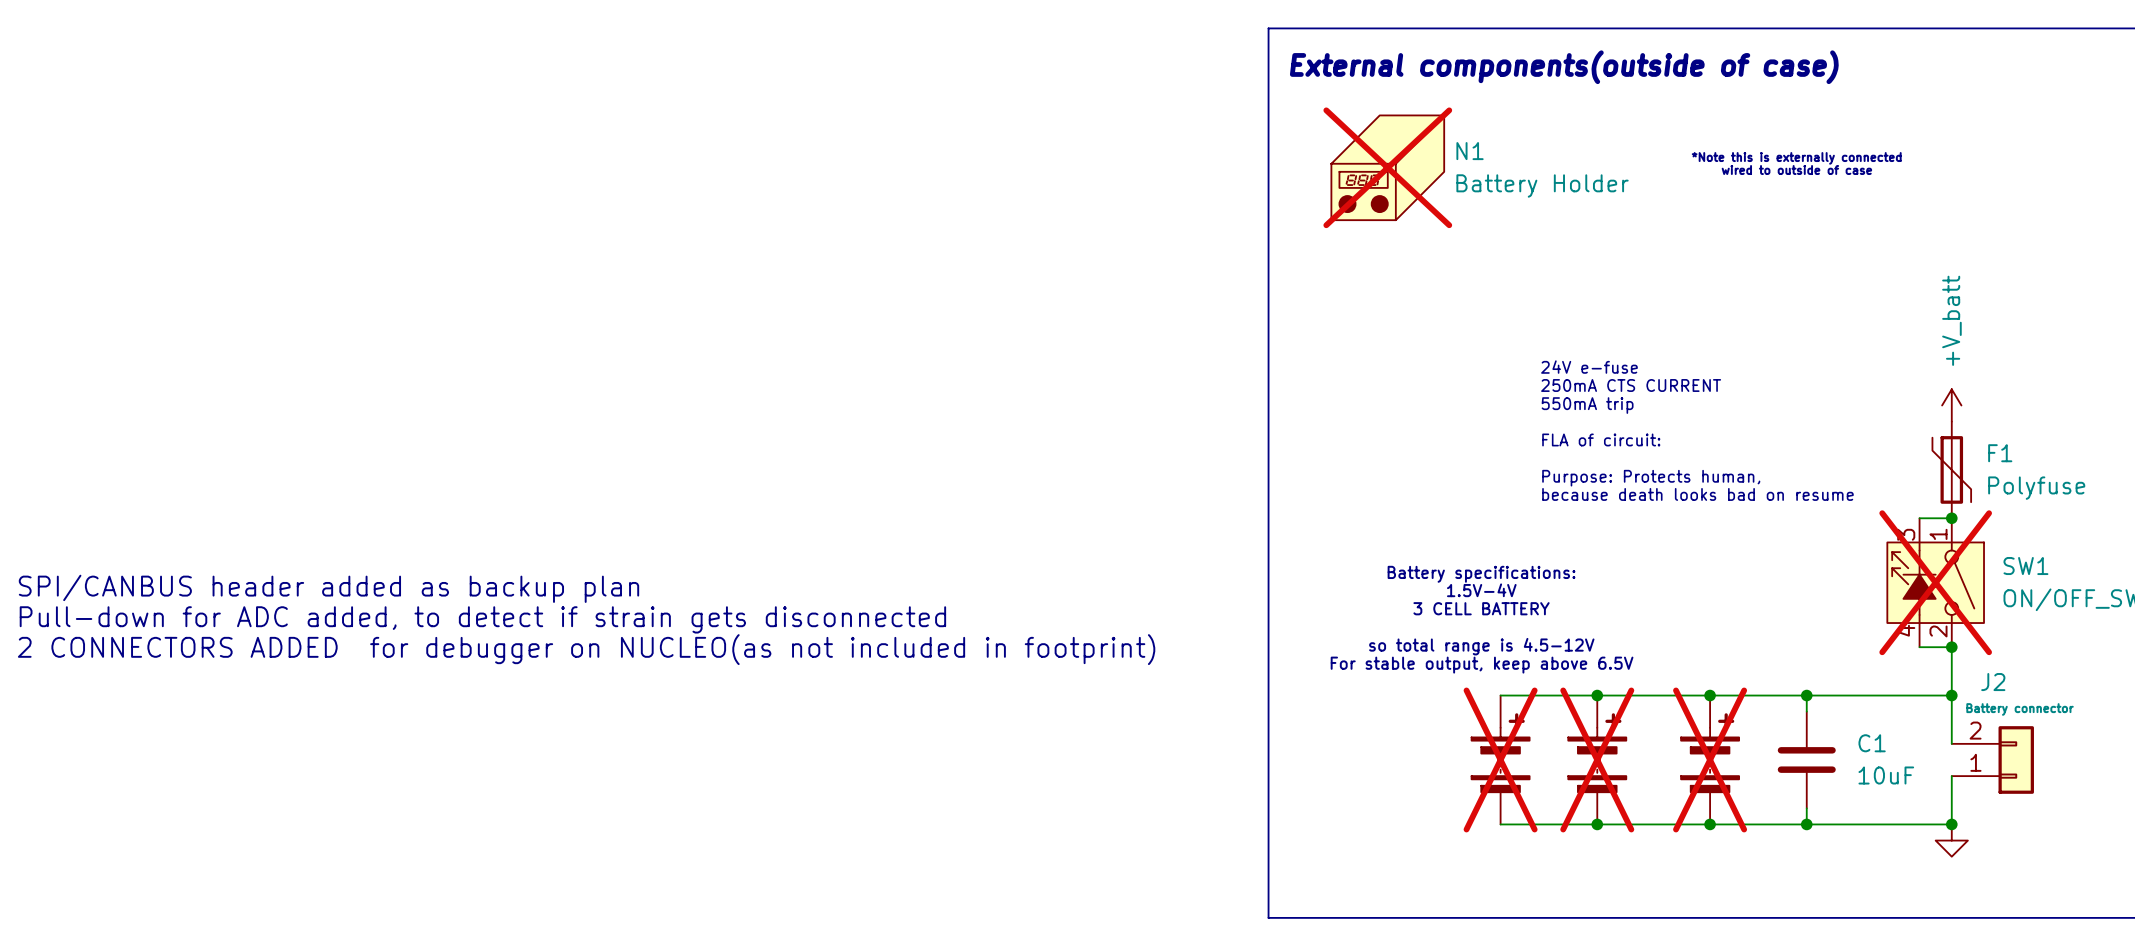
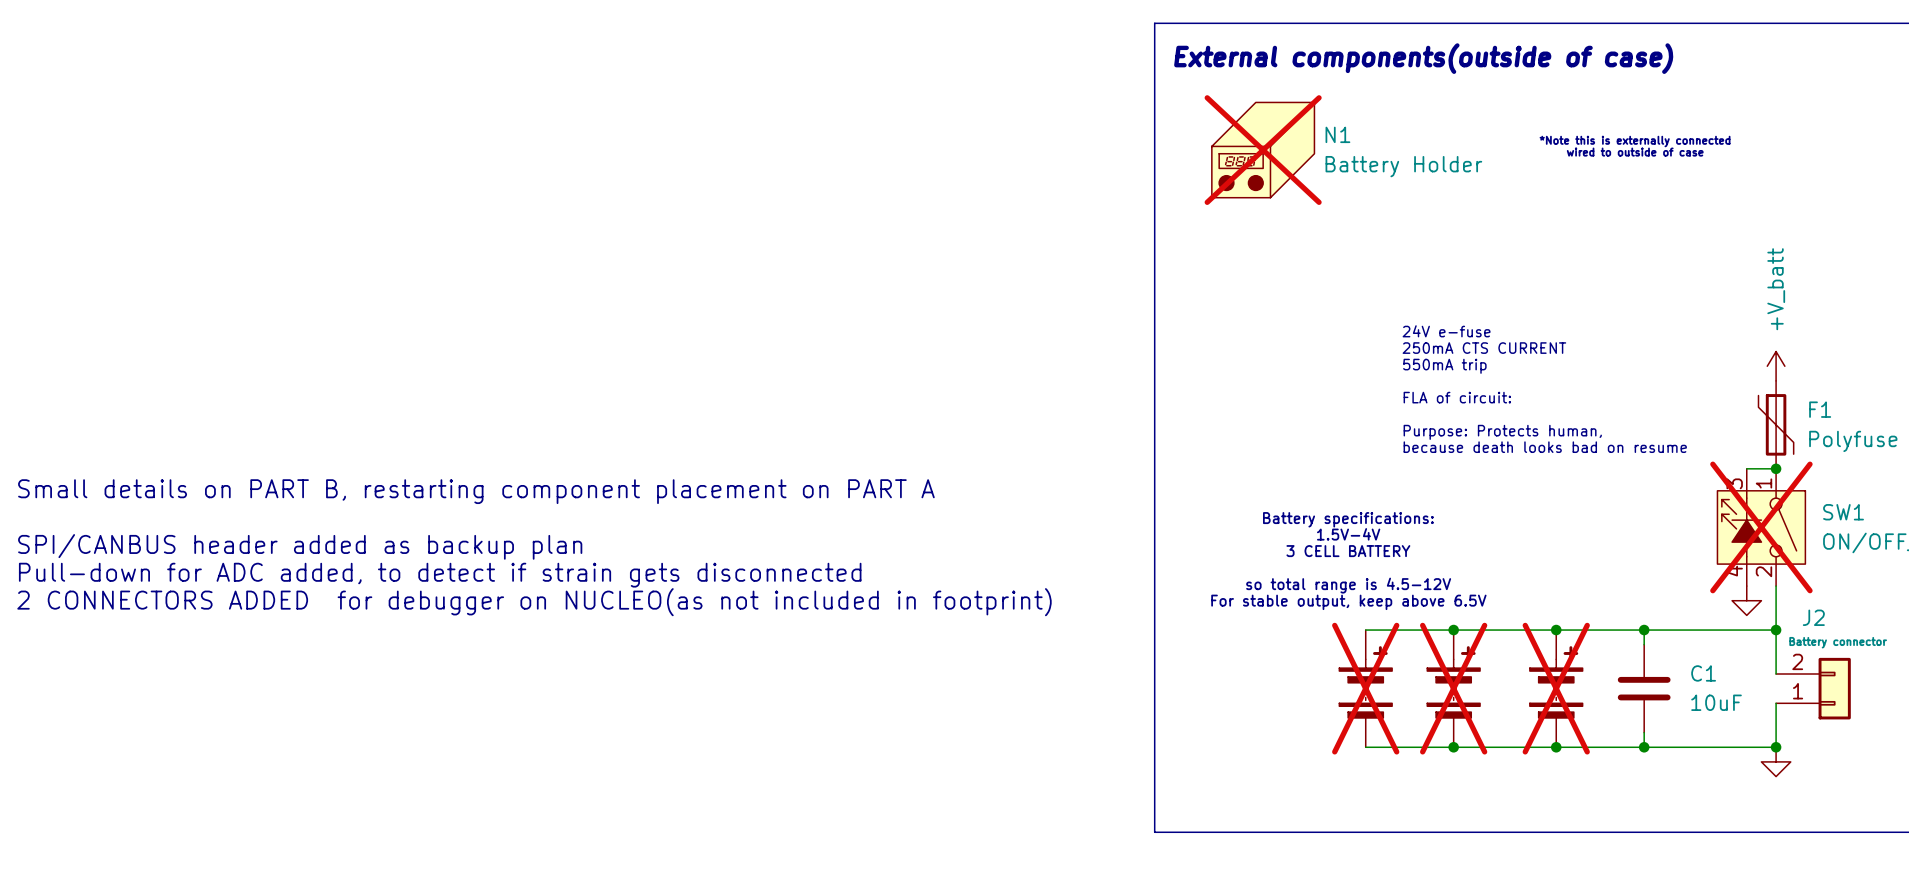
text: none -> Small details on PART B, restarting component placement on PART A (476, 491)
text position: SPI/CANBUS header added as backup plan (328, 588) -> SPI/CANBUS header added as backup plan (300, 546)
text position: Pull-down for ADC added, to detect if strain gets disconnected (482, 619) -> Pull-down for ADC added, to detect if strain gets disconnected (440, 575)
wire: (1919, 647) (1951, 647) -> none
junction: (1951, 647) -> none
text position: 2 CONNECTORS ADDED for debugger on NUCLEO(as not included in footprint) (586, 649) -> 2 CONNECTORS ADDED for debugger on NUCLEO(as not included in footprint) (534, 602)
power symbol: none -> (1746, 600)

